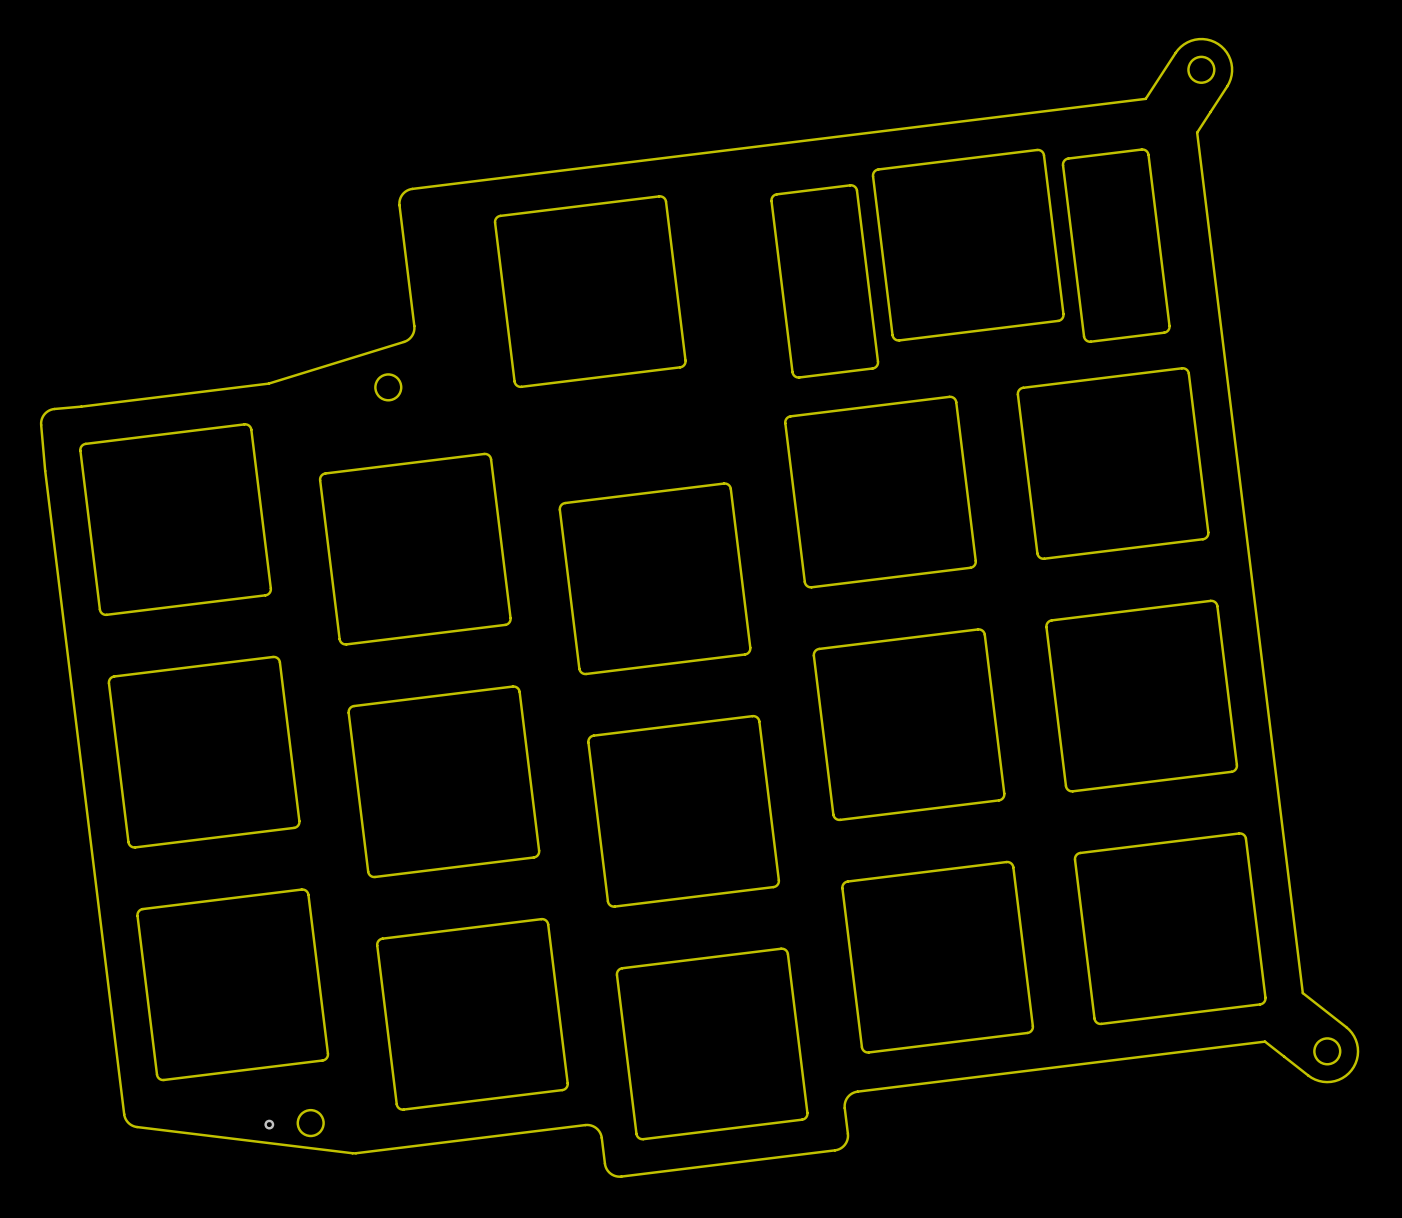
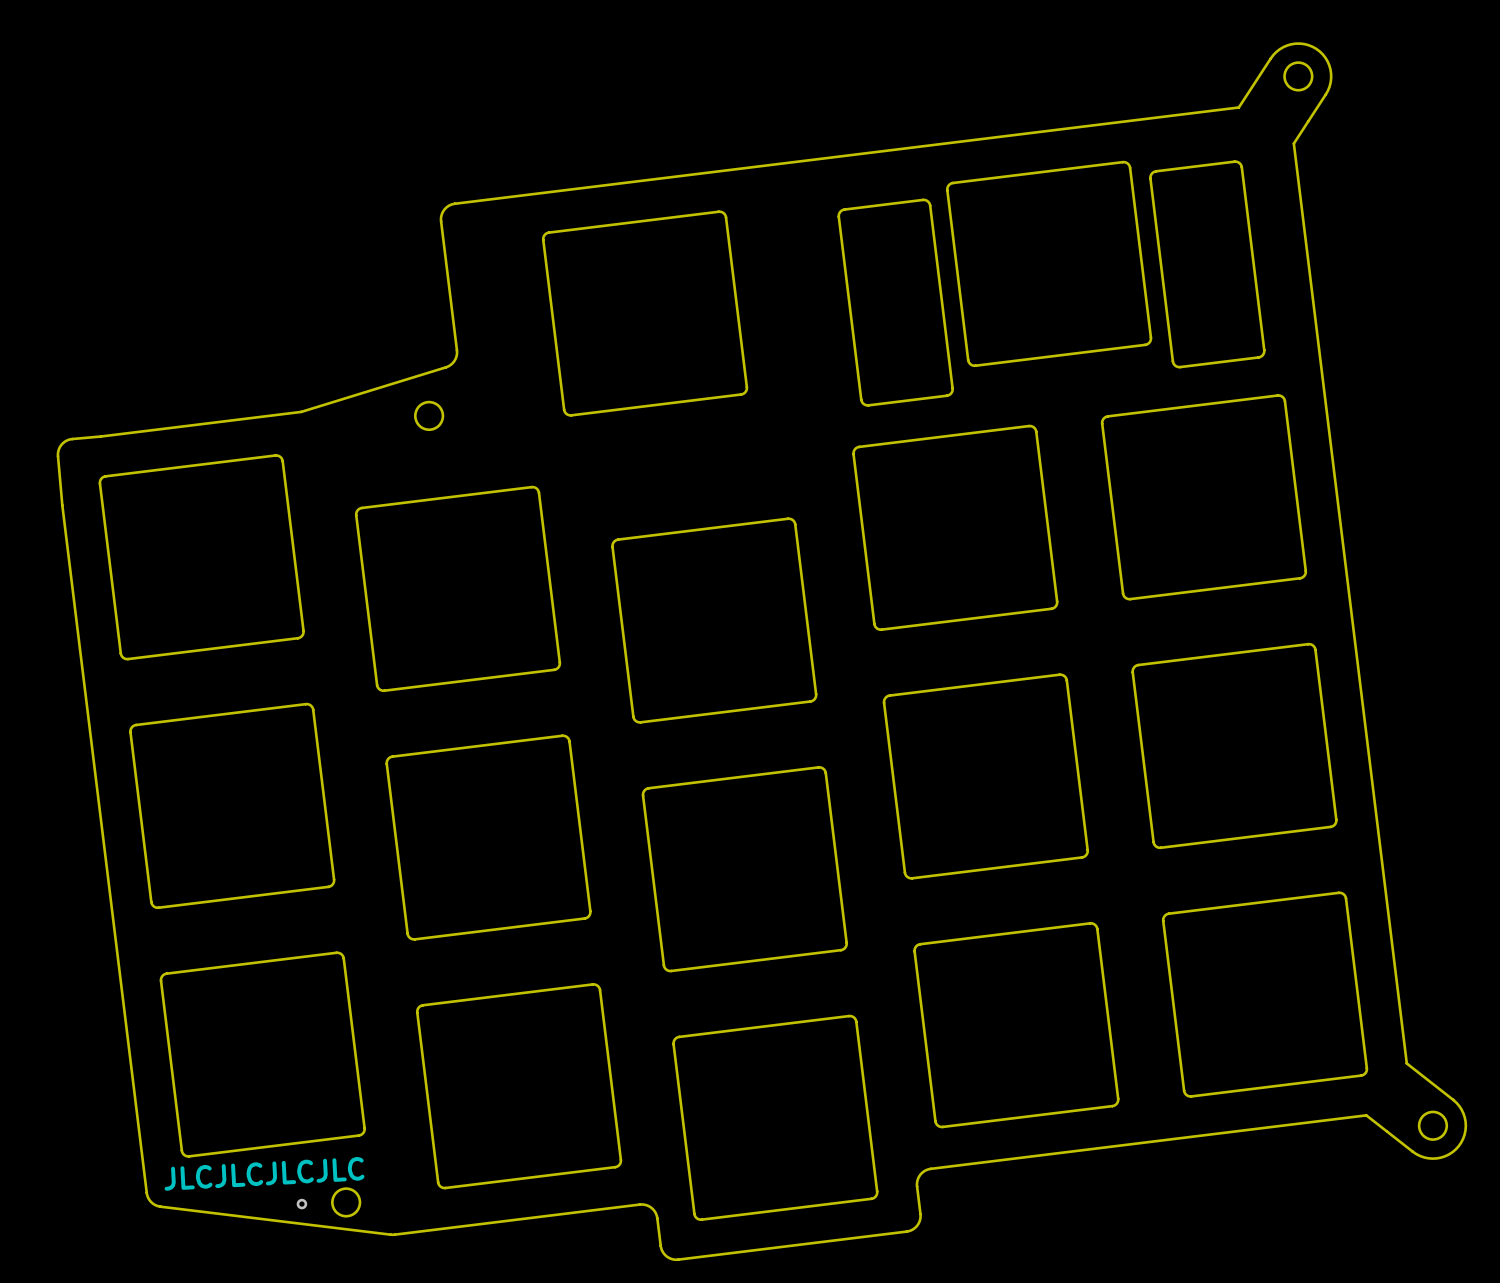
text: none -> JLCJLCJLCJLC (264, 1173)

